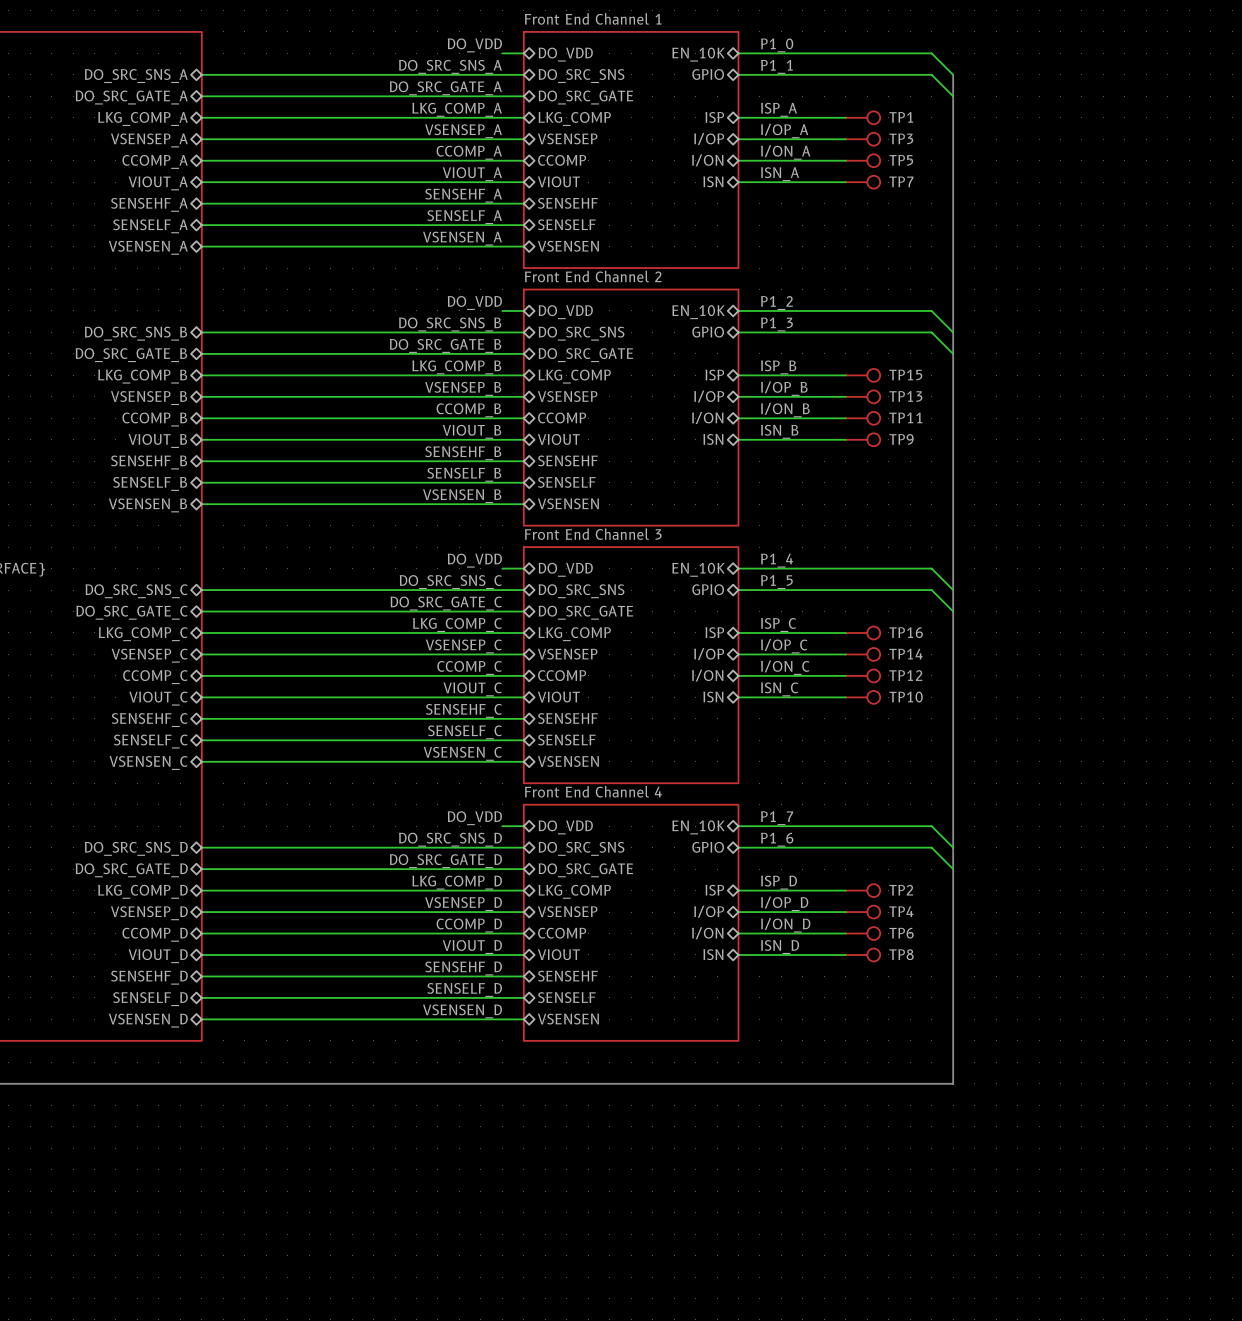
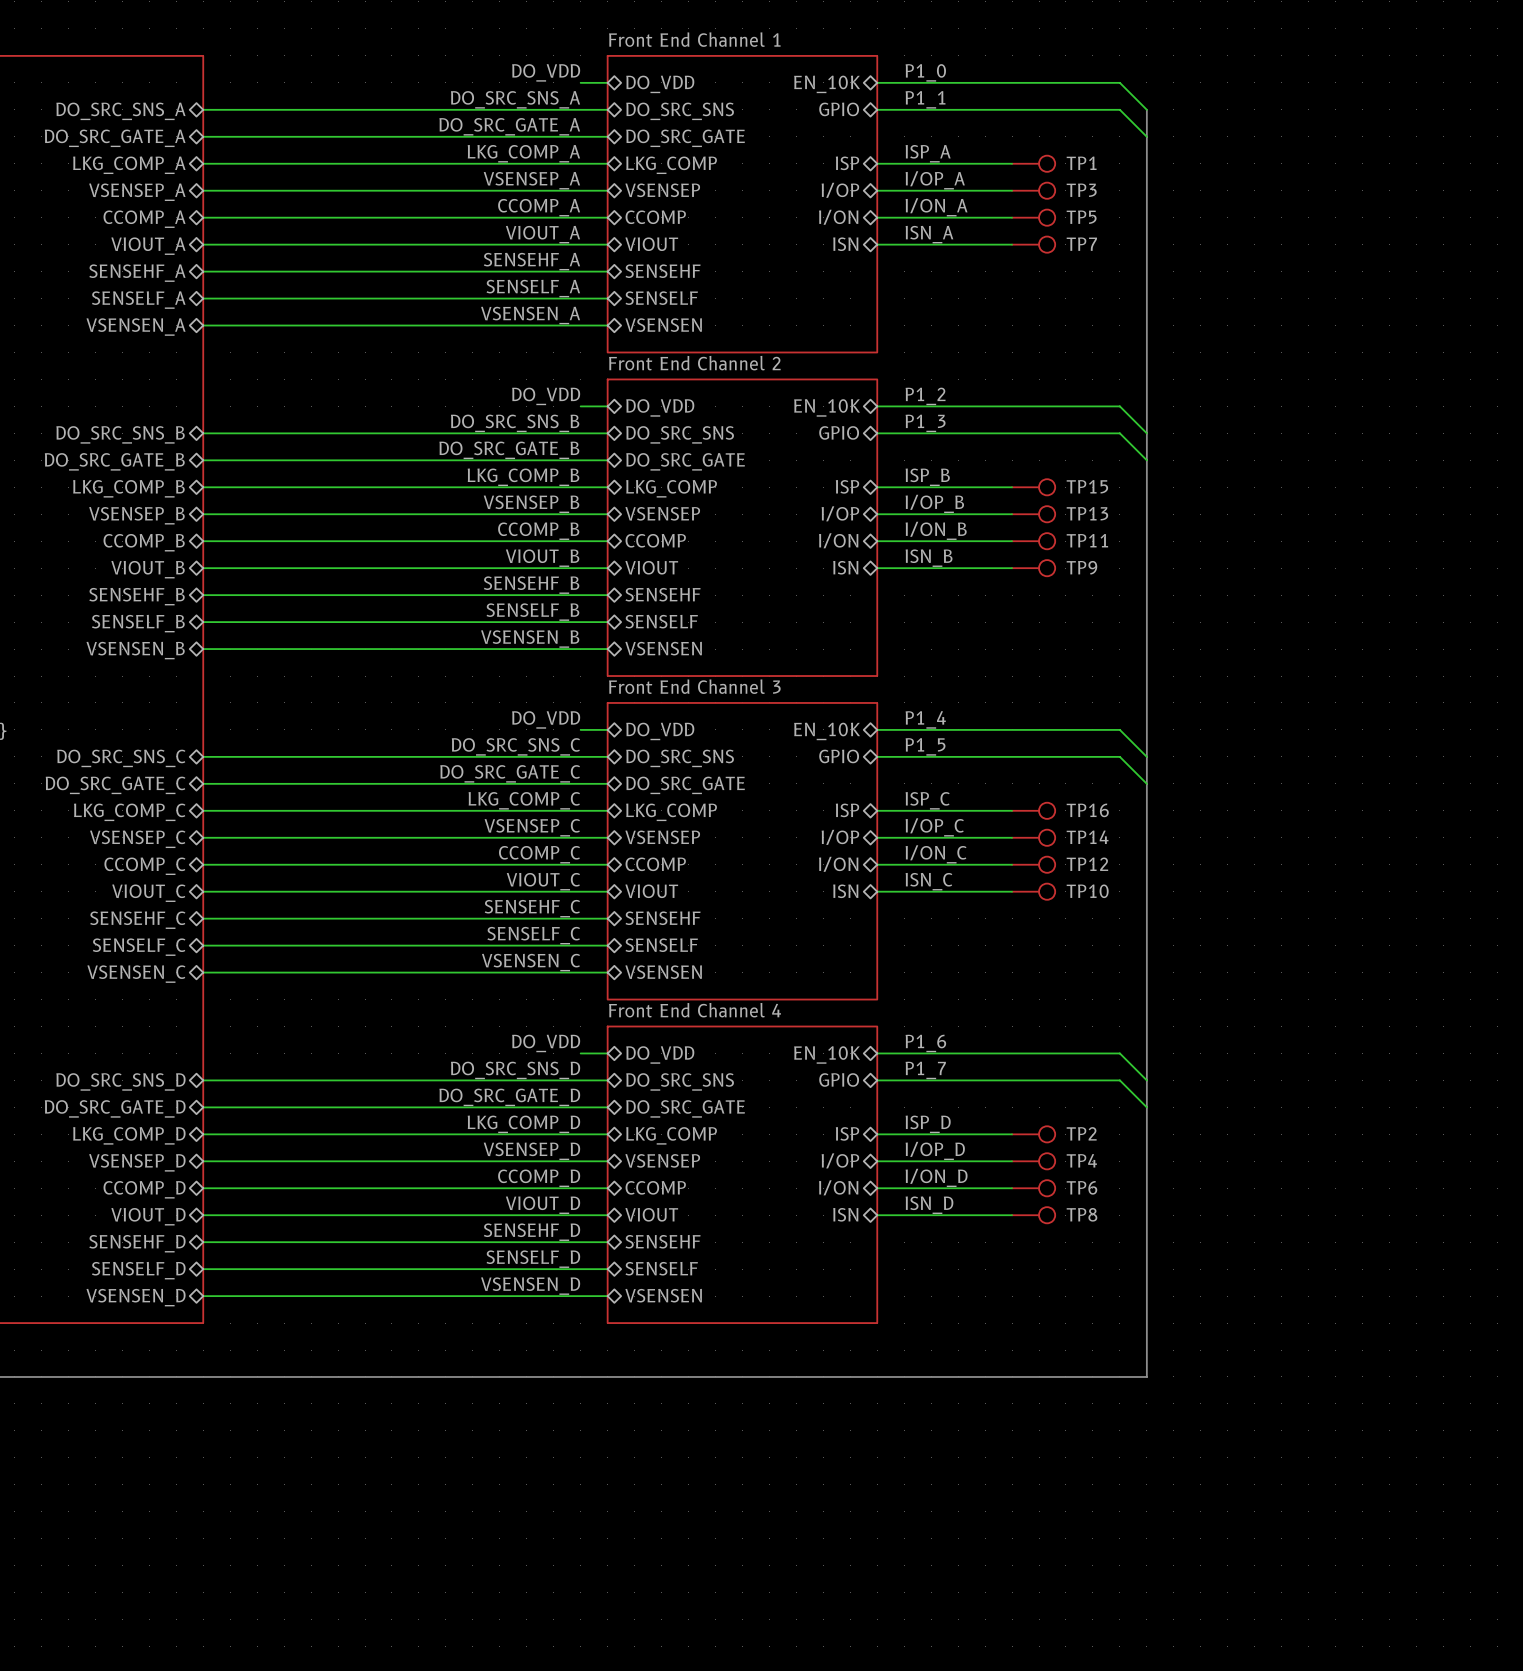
label: P1_7 (777, 818) -> P1_6 (925, 1043)
label: P1_6 (777, 839) -> P1_7 (925, 1070)

